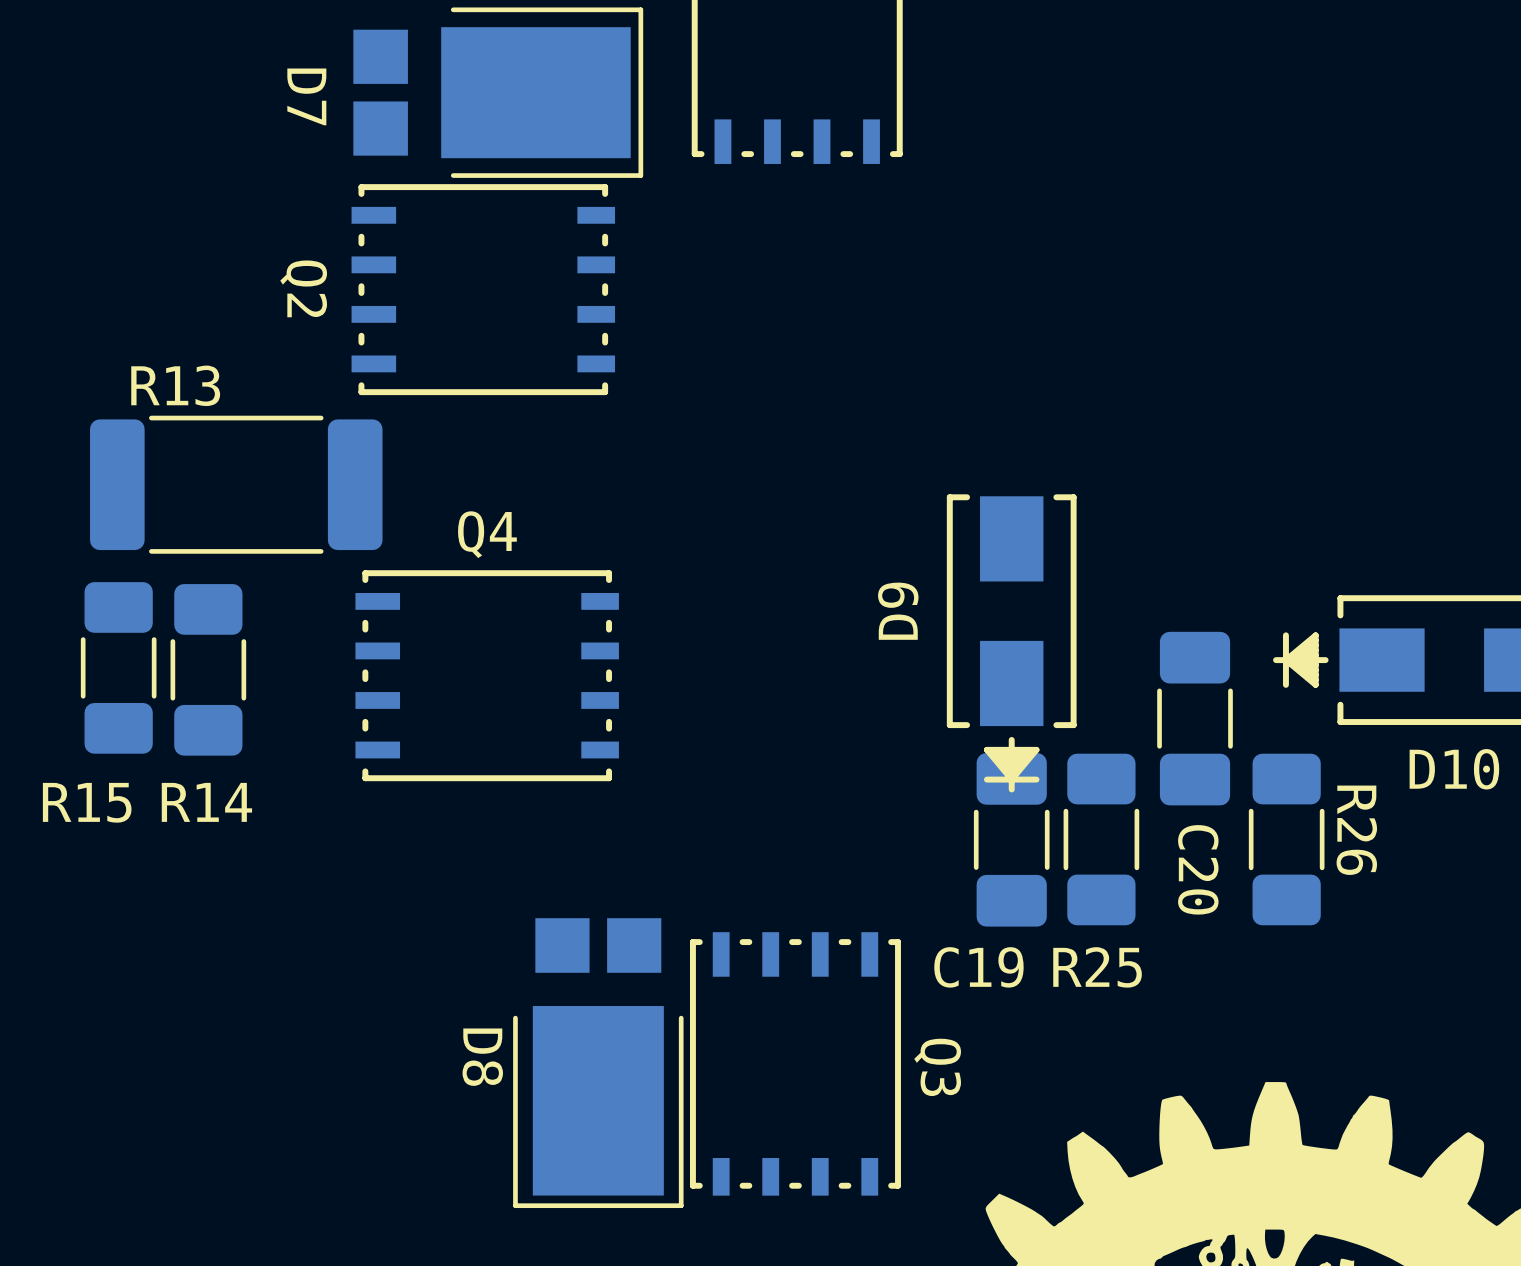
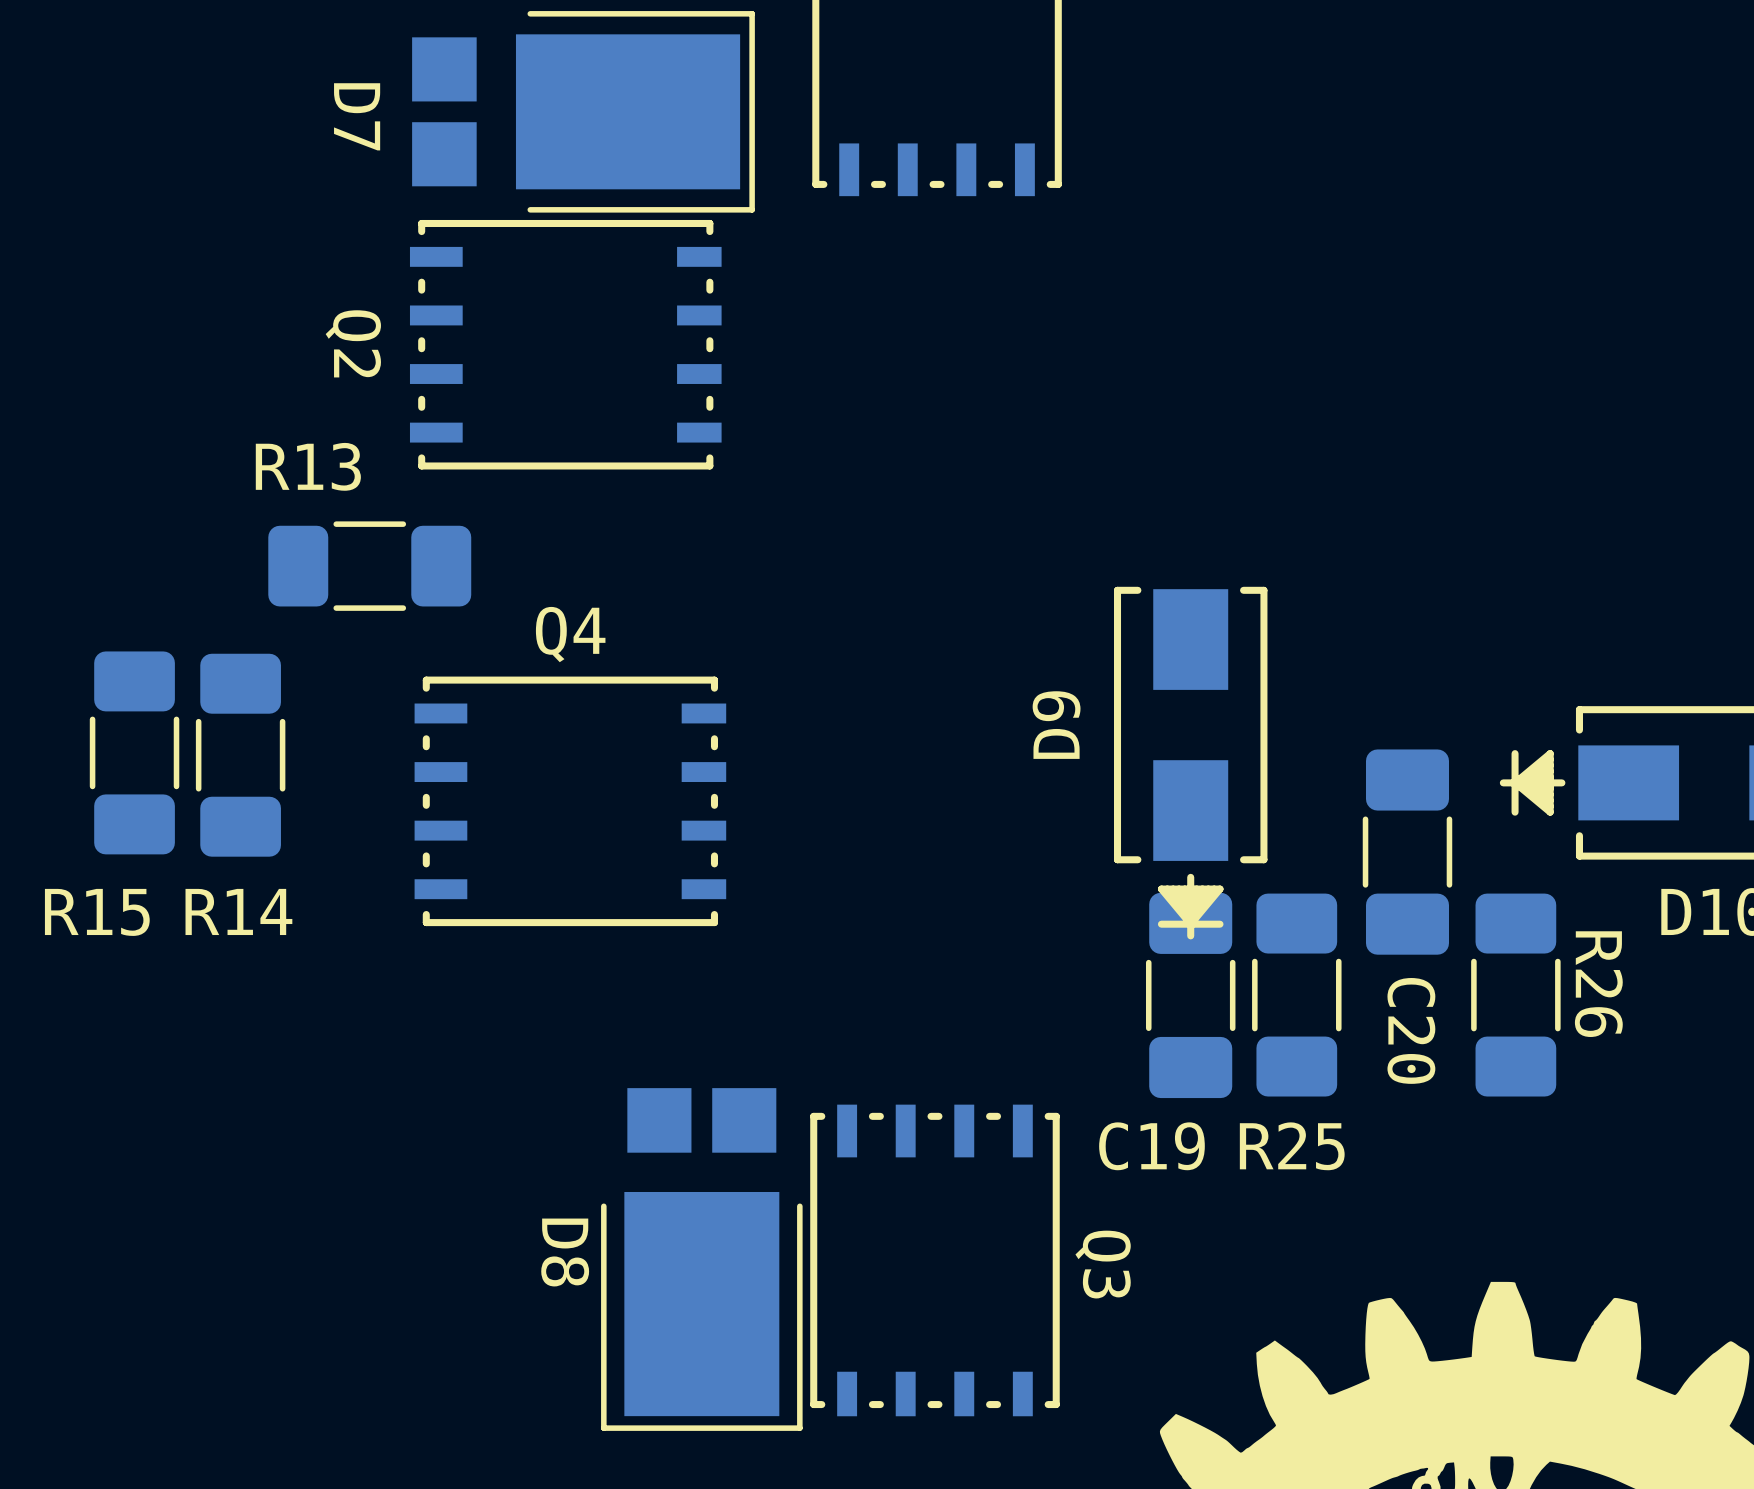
R13 footprint: [90, 415, 383, 554] -> [268, 521, 472, 611]
R15 position: (118, 667) -> (134, 752)
R14 position: (208, 669) -> (240, 755)

